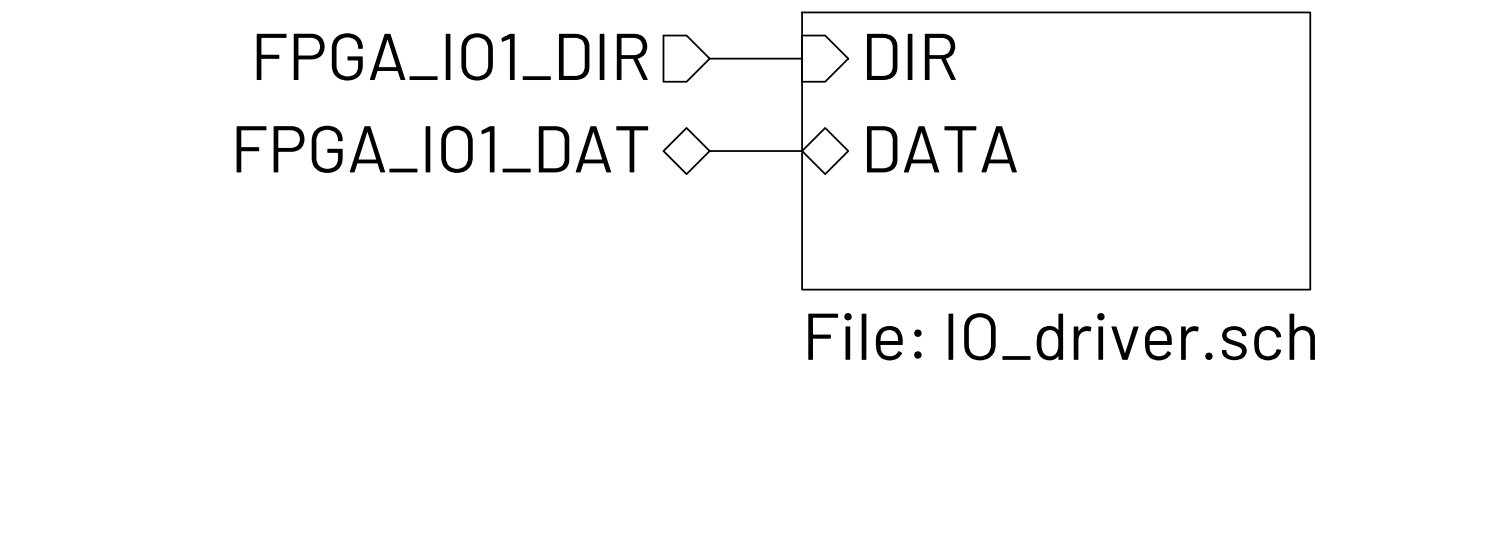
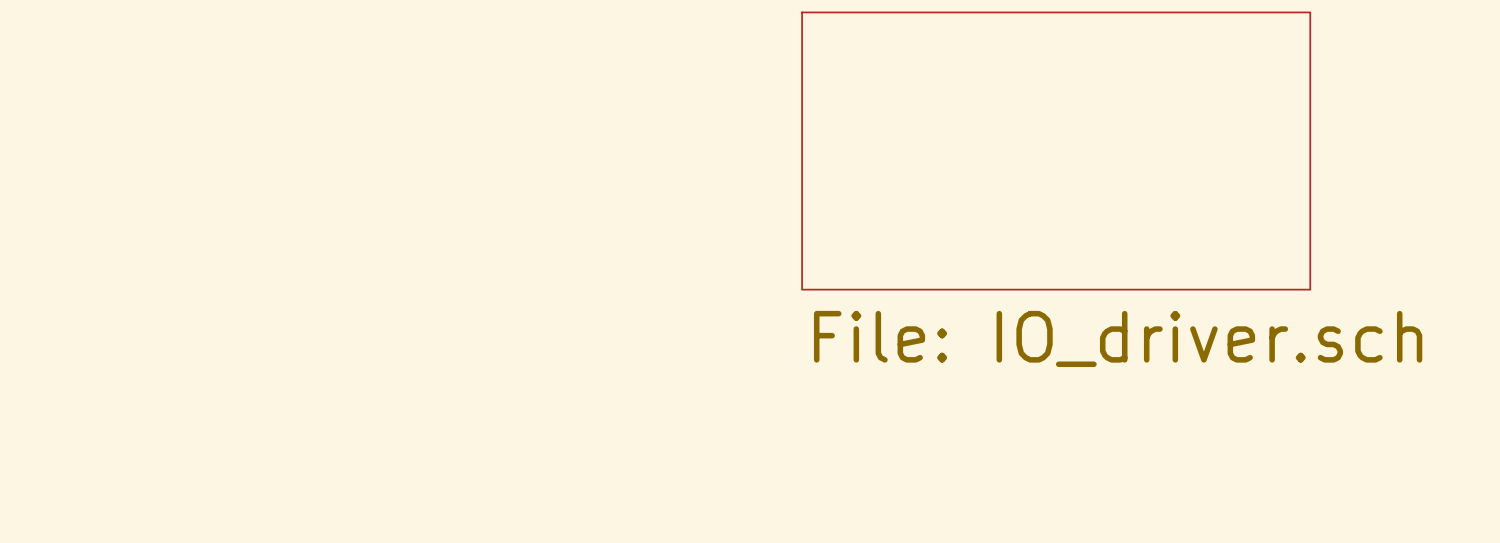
hierarchical label: FPGA_IO1_DIR (452, 56) -> none
sheet pin: DIR (911, 56) -> none
wire: (709, 58) (802, 58) -> none
hierarchical label: FPGA_IO1_DAT (442, 149) -> none
sheet pin: DATA (941, 149) -> none
wire: (709, 151) (802, 151) -> none

